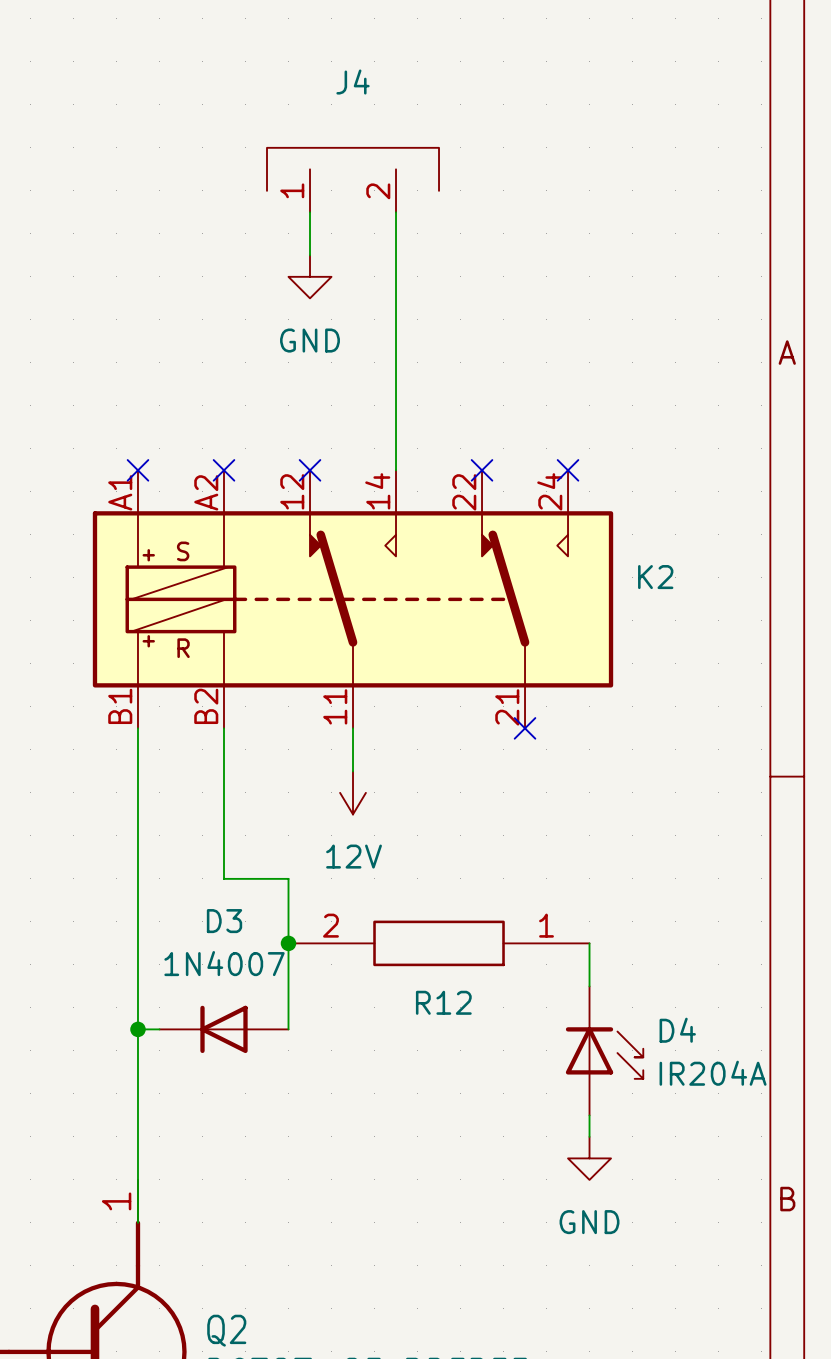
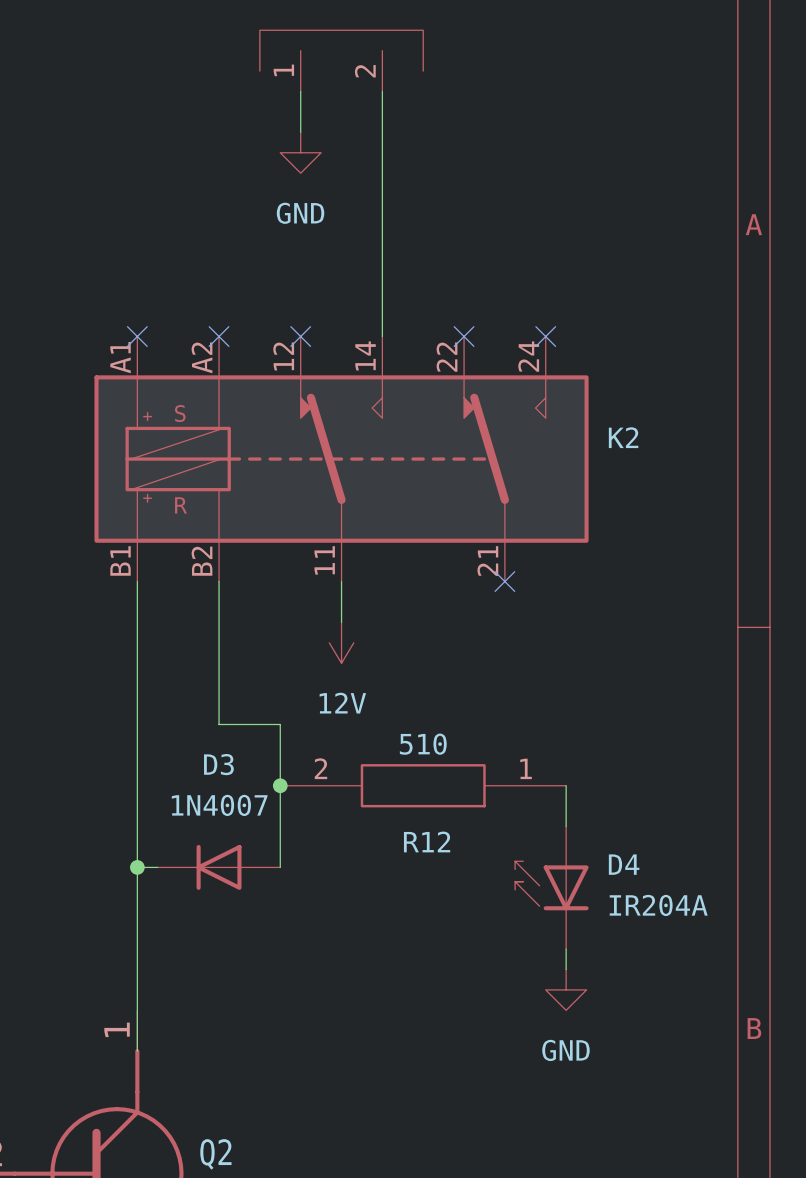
R12 value: none -> 510 (423, 744)
D4 rotation: 0° (604, 1053) -> 180° (551, 885)

